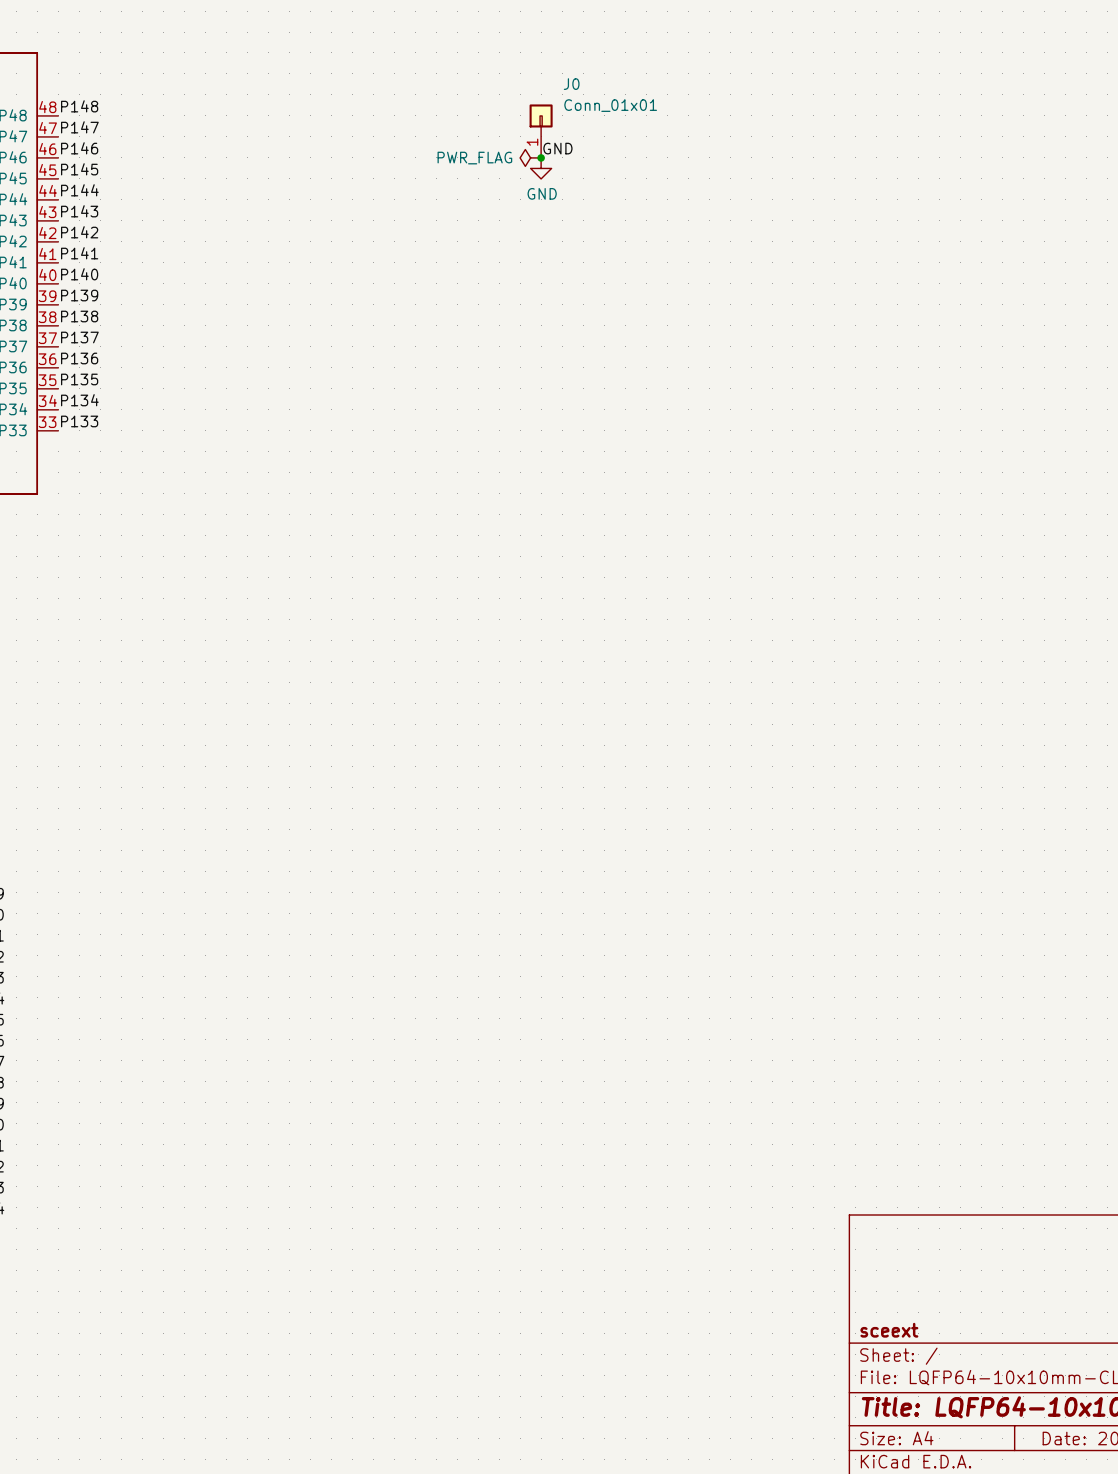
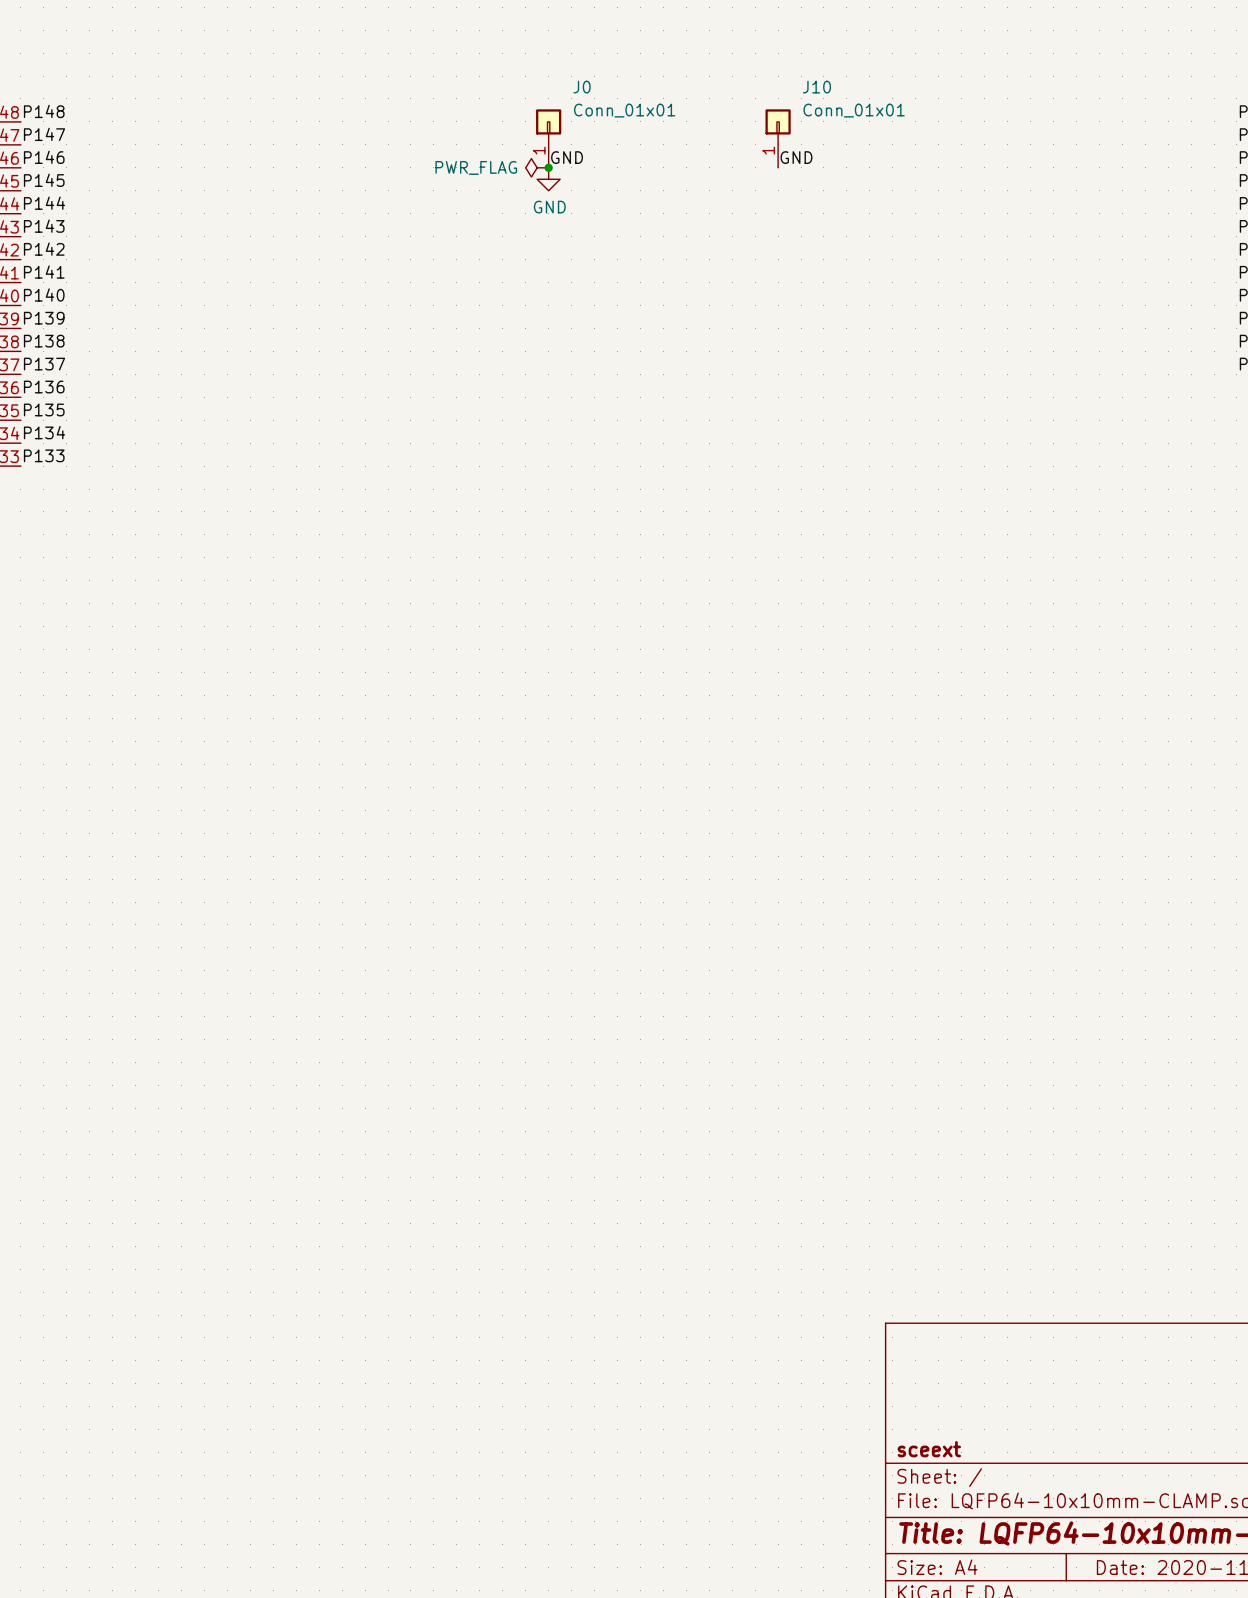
J10: none -> Conn_01x01 (778, 138)
label: none -> GND (796, 157)

